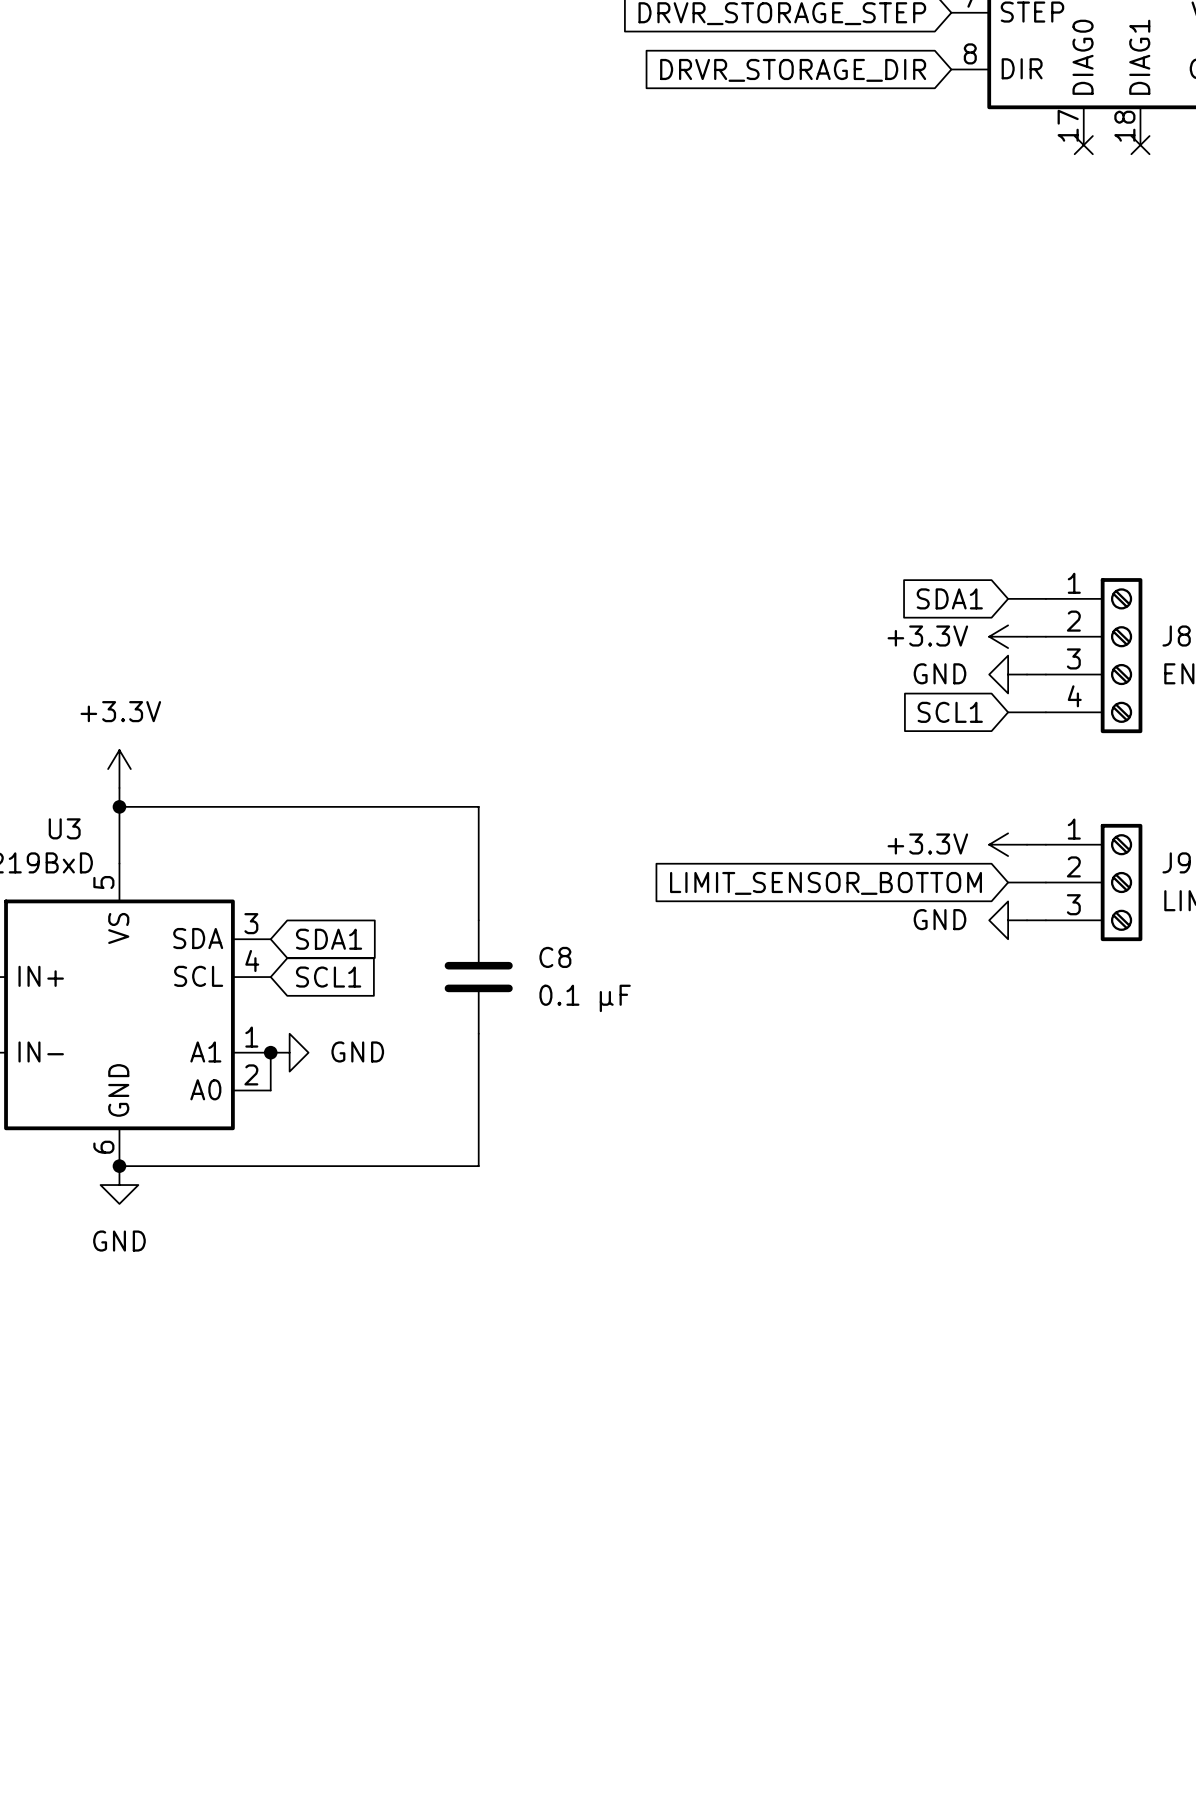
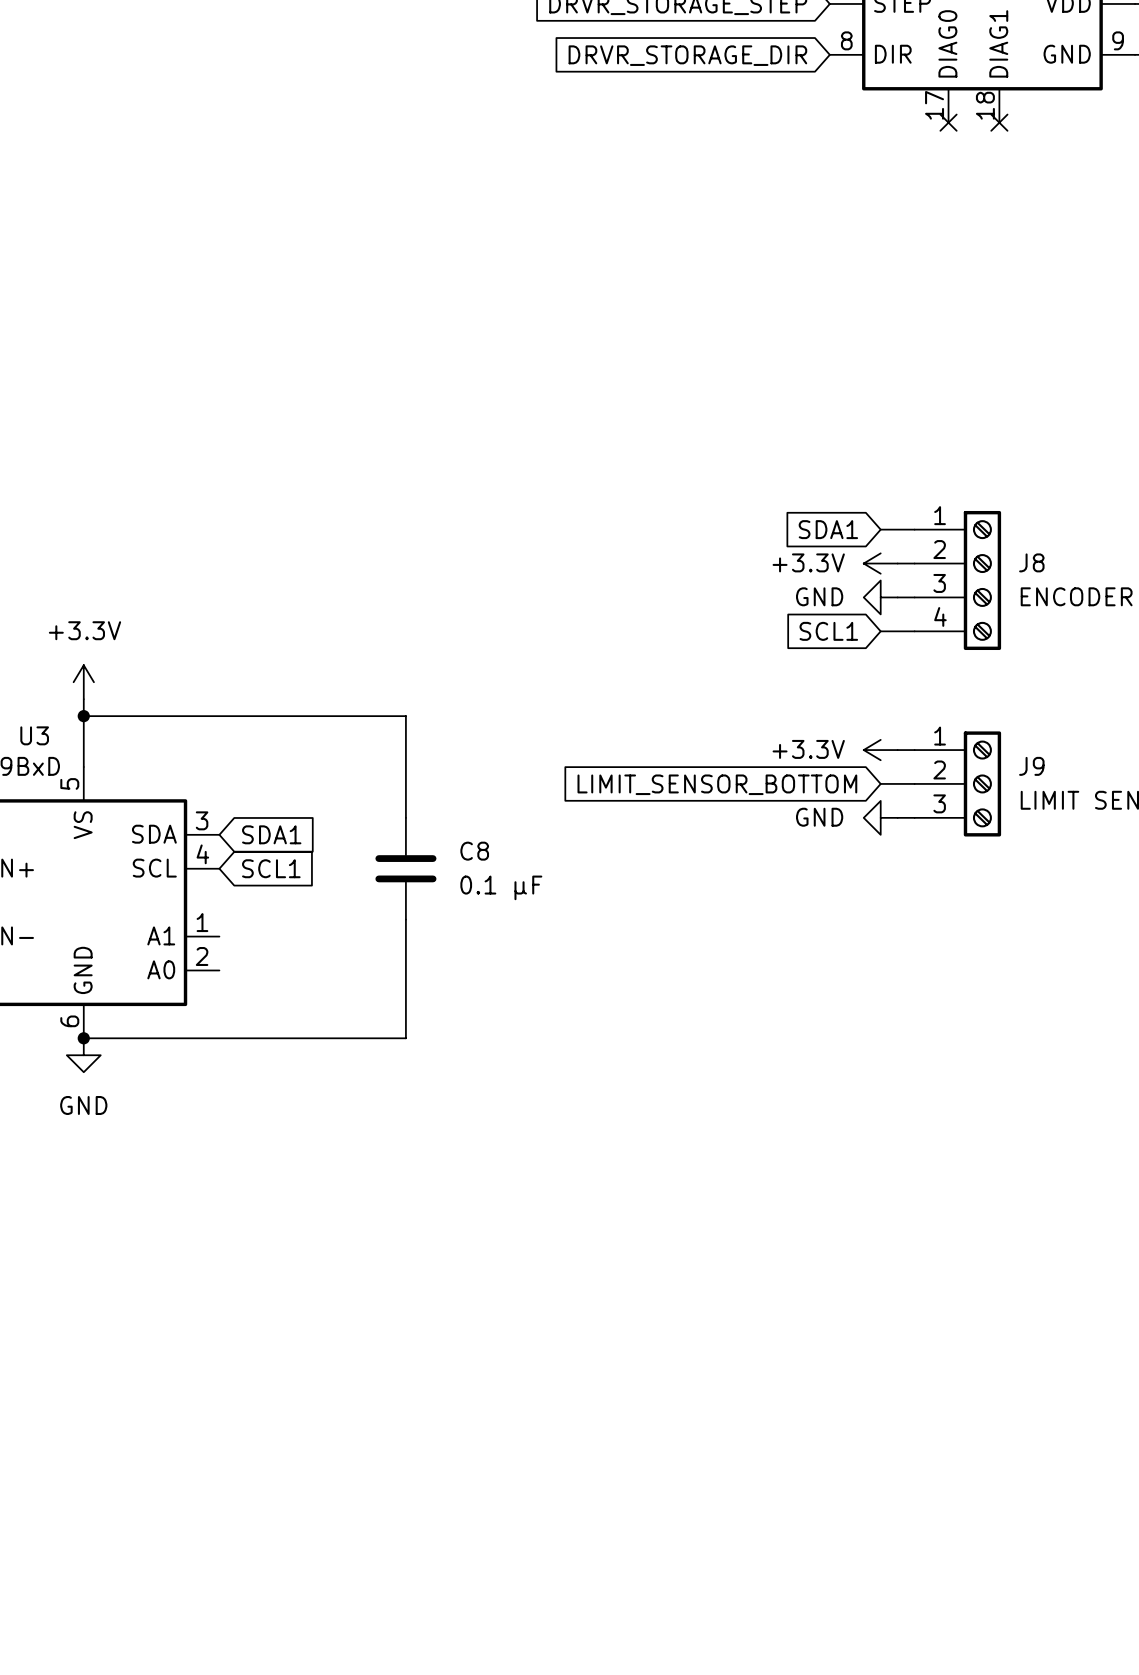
wire: (270, 1052) (270, 1090) -> none
junction: (270, 1052) -> none
power symbol: GND (289, 1052) -> none

